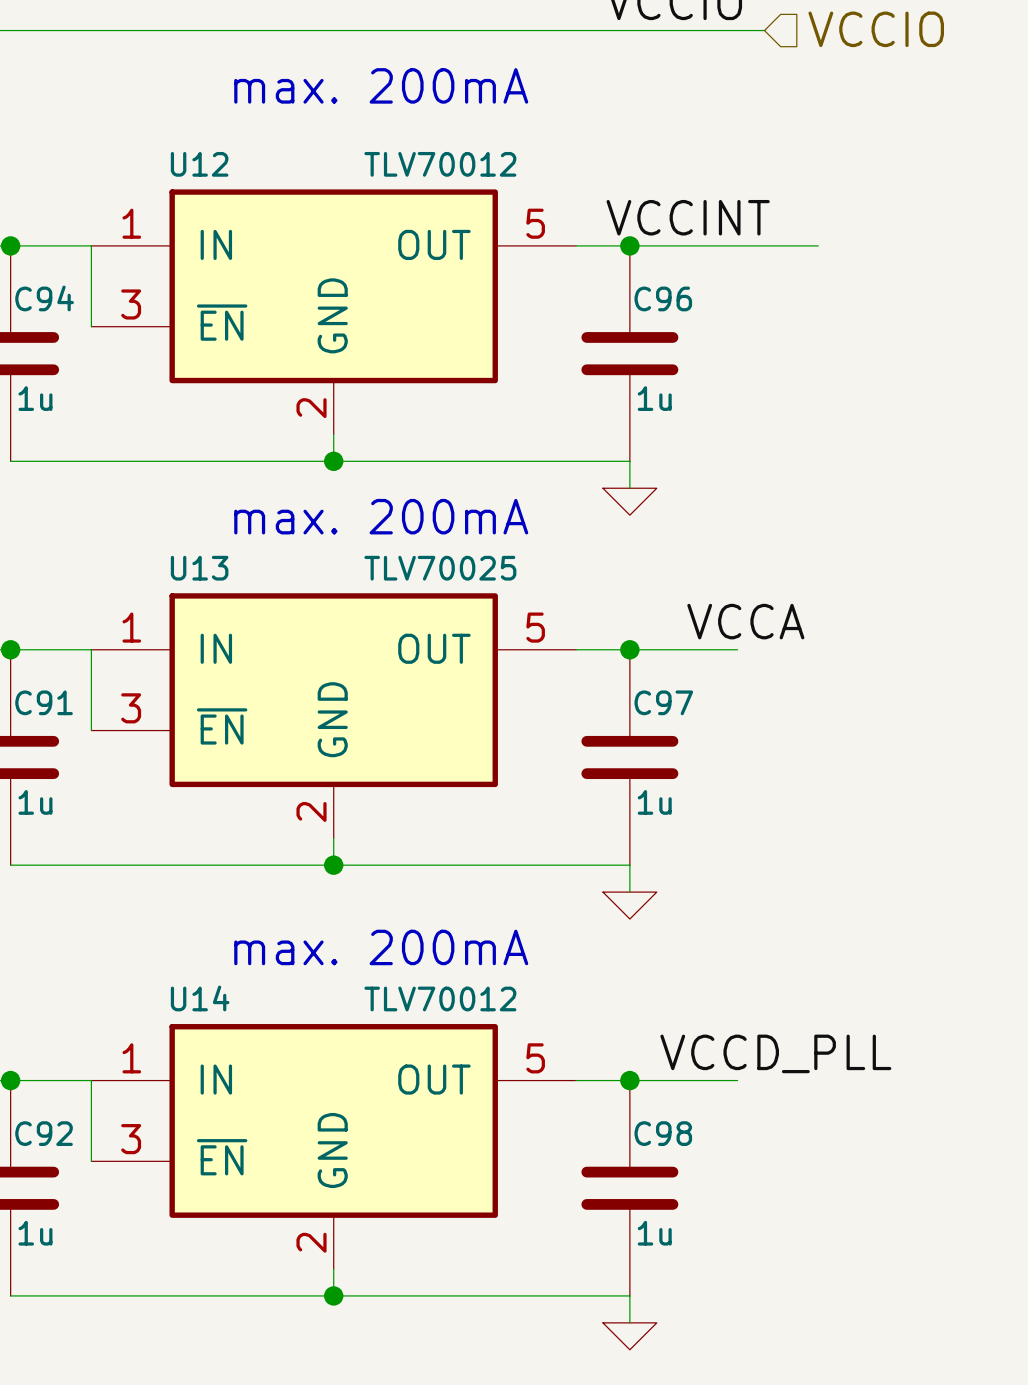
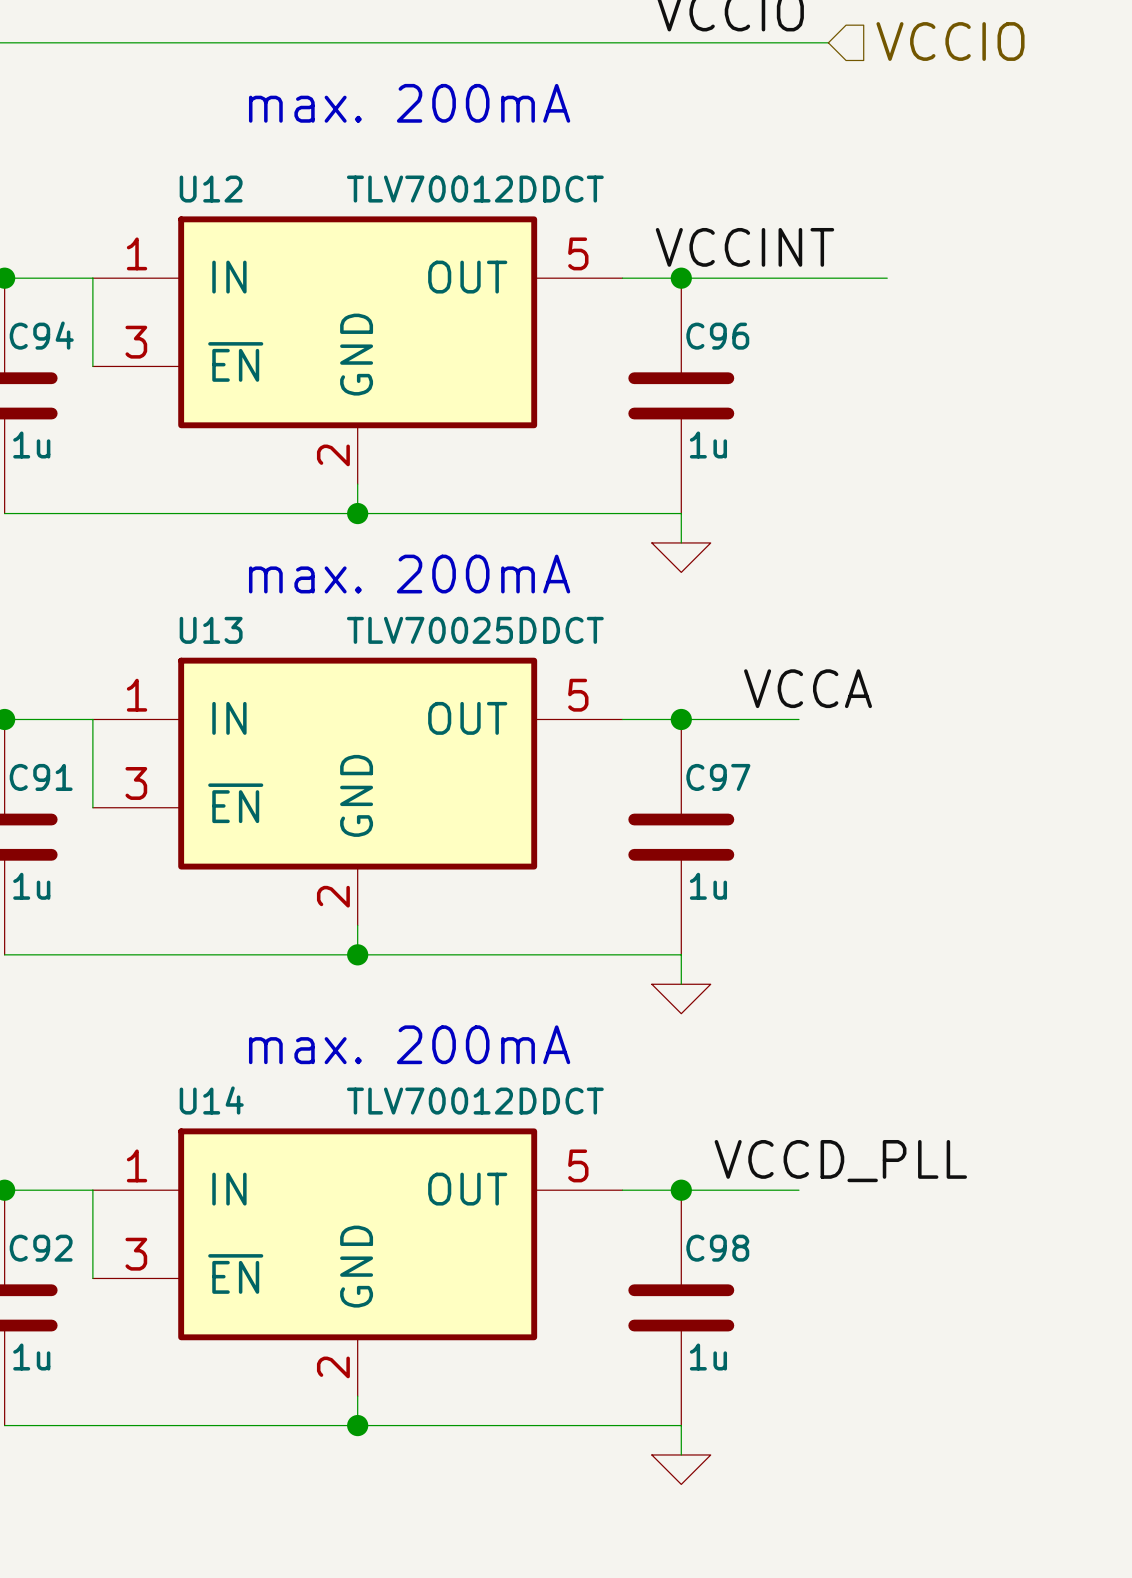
U12 value: TLV70012 (440, 164) -> TLV70012DDCT (475, 189)
U13 value: TLV70025 (440, 568) -> TLV70025DDCT (475, 630)
U14 value: TLV70012 (440, 998) -> TLV70012DDCT (475, 1101)

